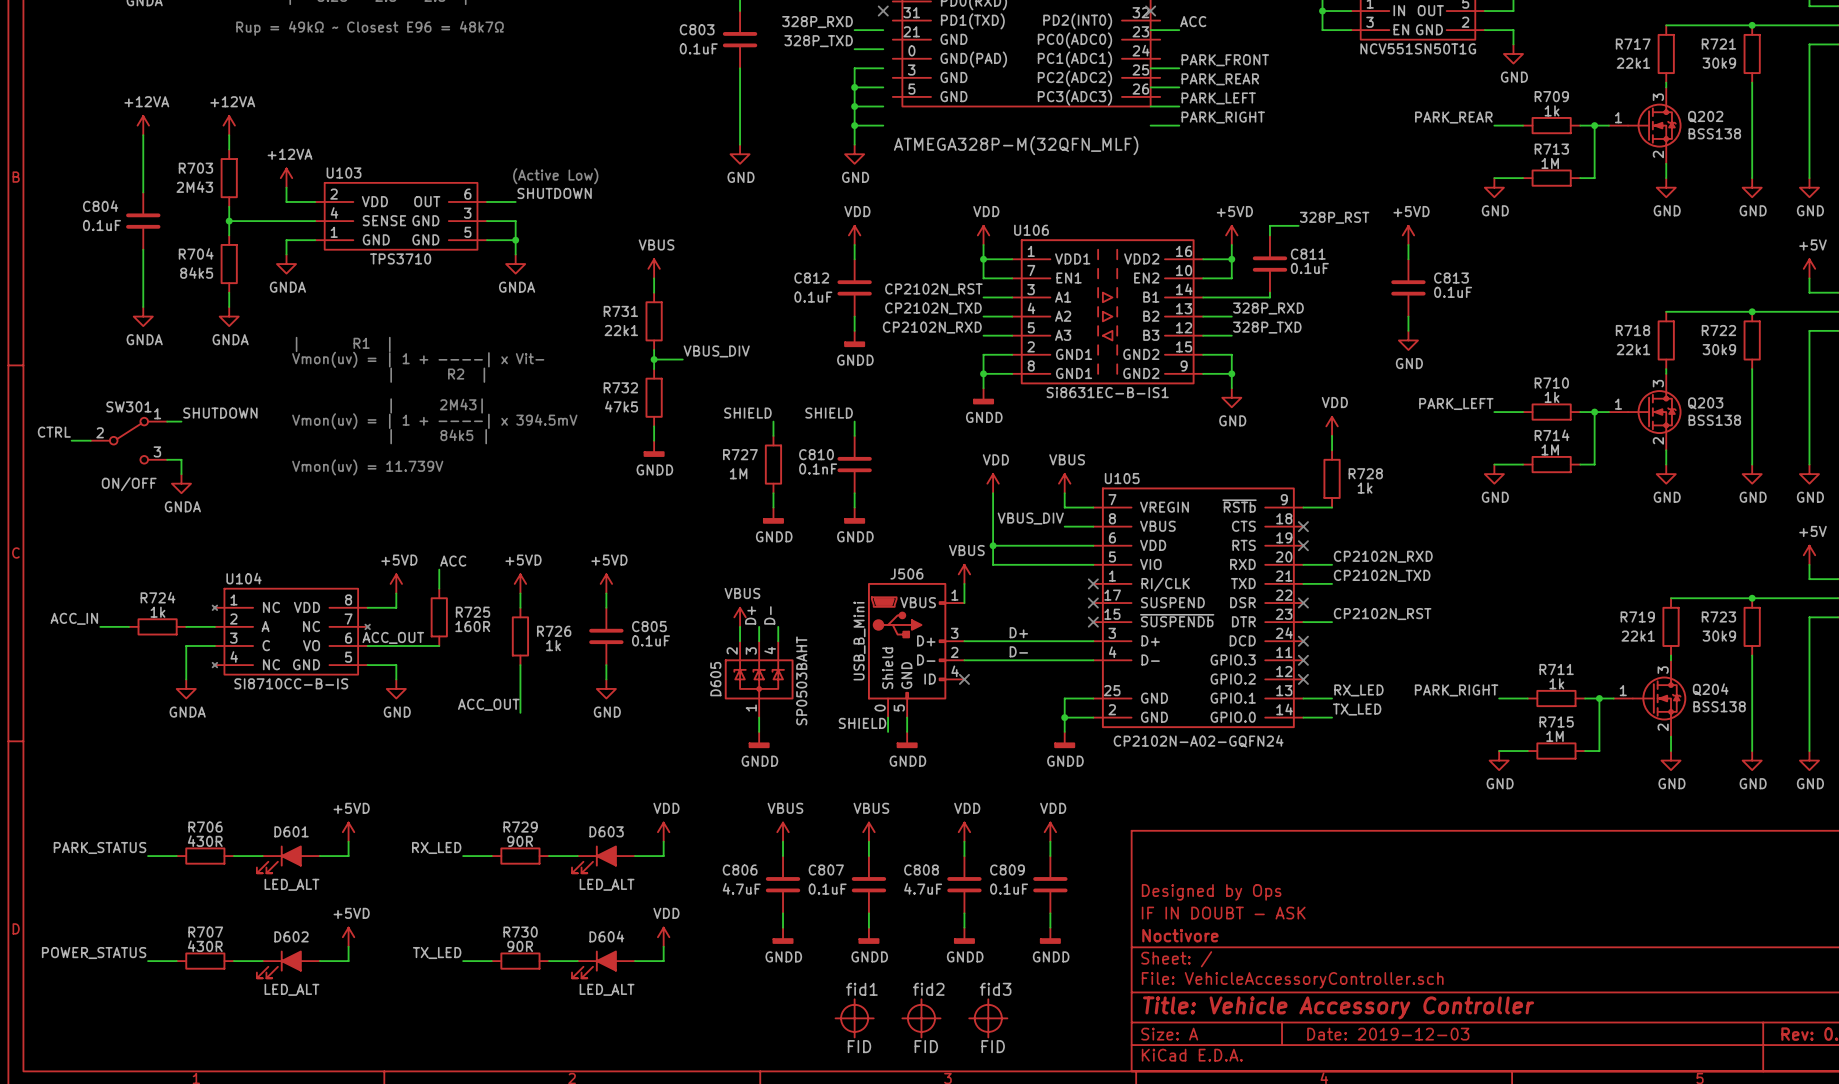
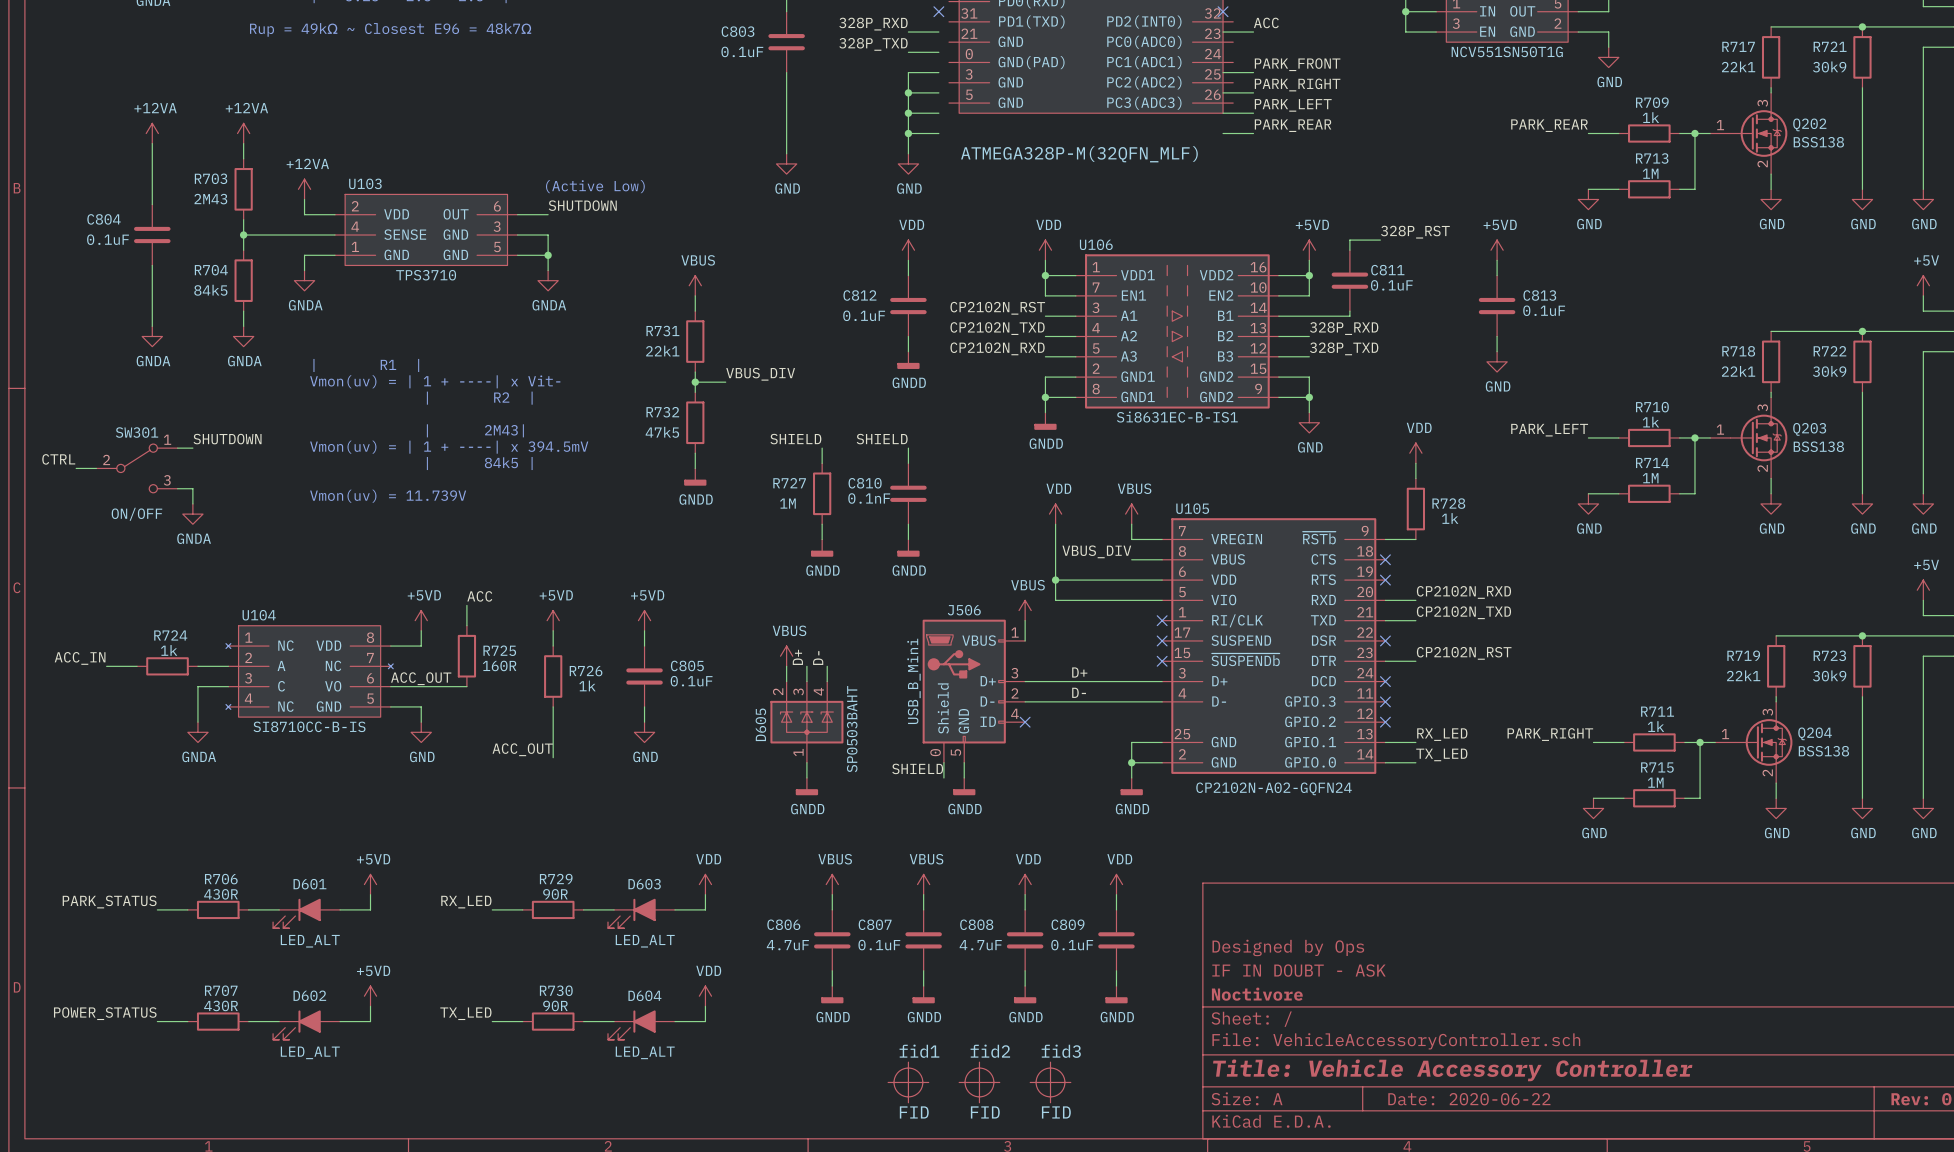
label: PARK_REAR (1220, 79) -> PARK_RIGHT (1297, 84)
label: PARK_RIGHT (1223, 117) -> PARK_REAR (1293, 125)
title block: Date: 2019-12-03 (1388, 1034) -> Date: 2020-06-22 (1469, 1099)

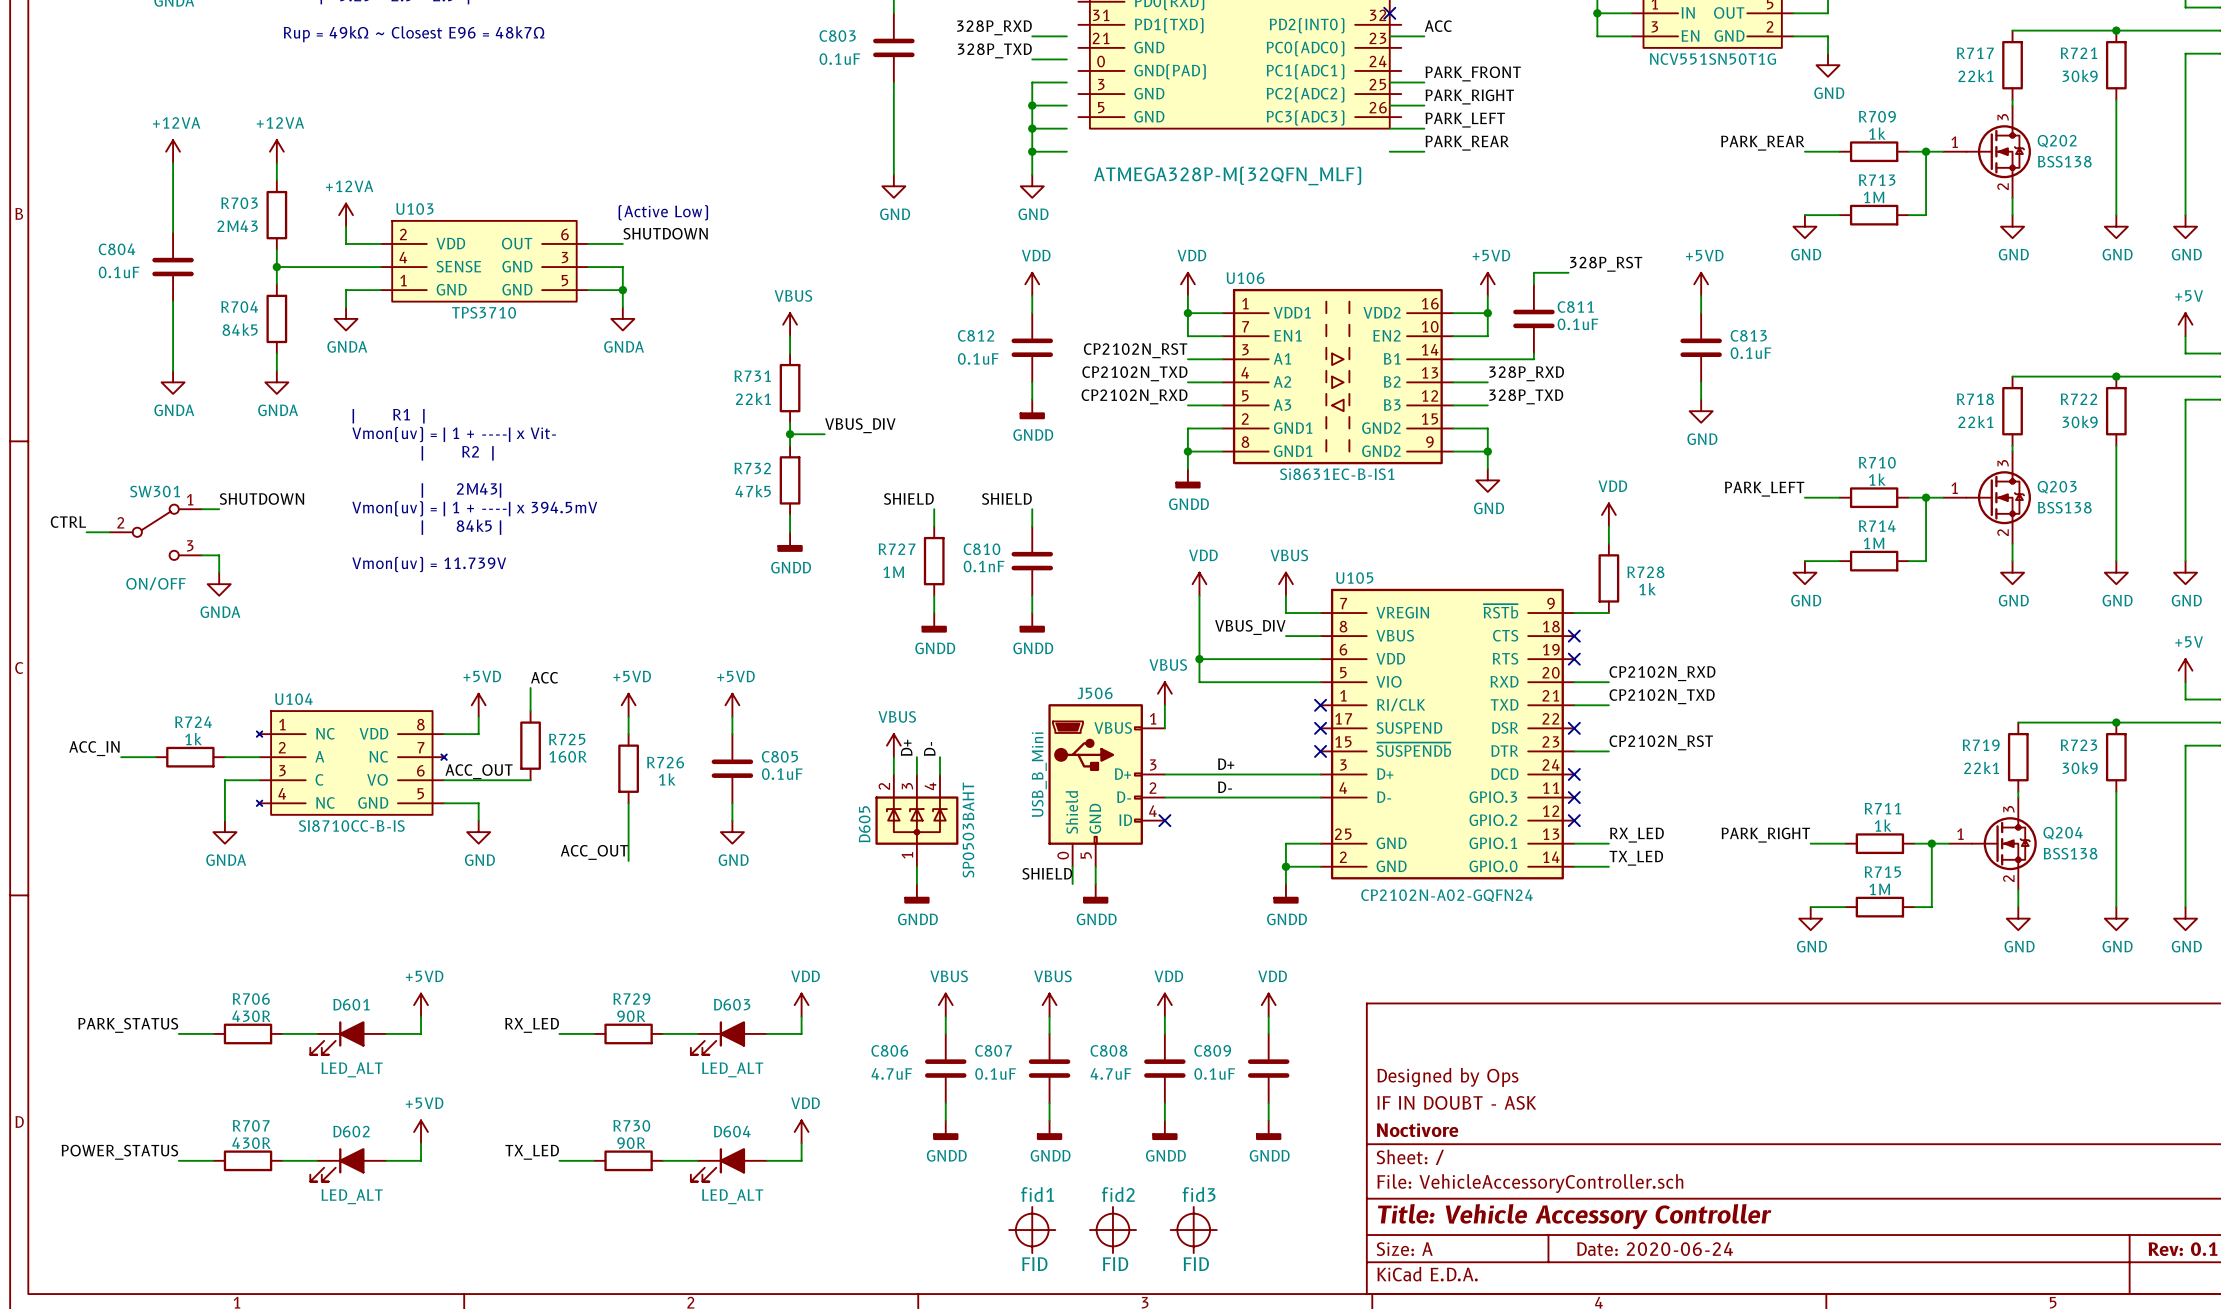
no-connect mark: (938, 11) -> none
title block: Date: 2020-06-22 (1469, 1099) -> Date: 2020-06-24 (1655, 1249)

